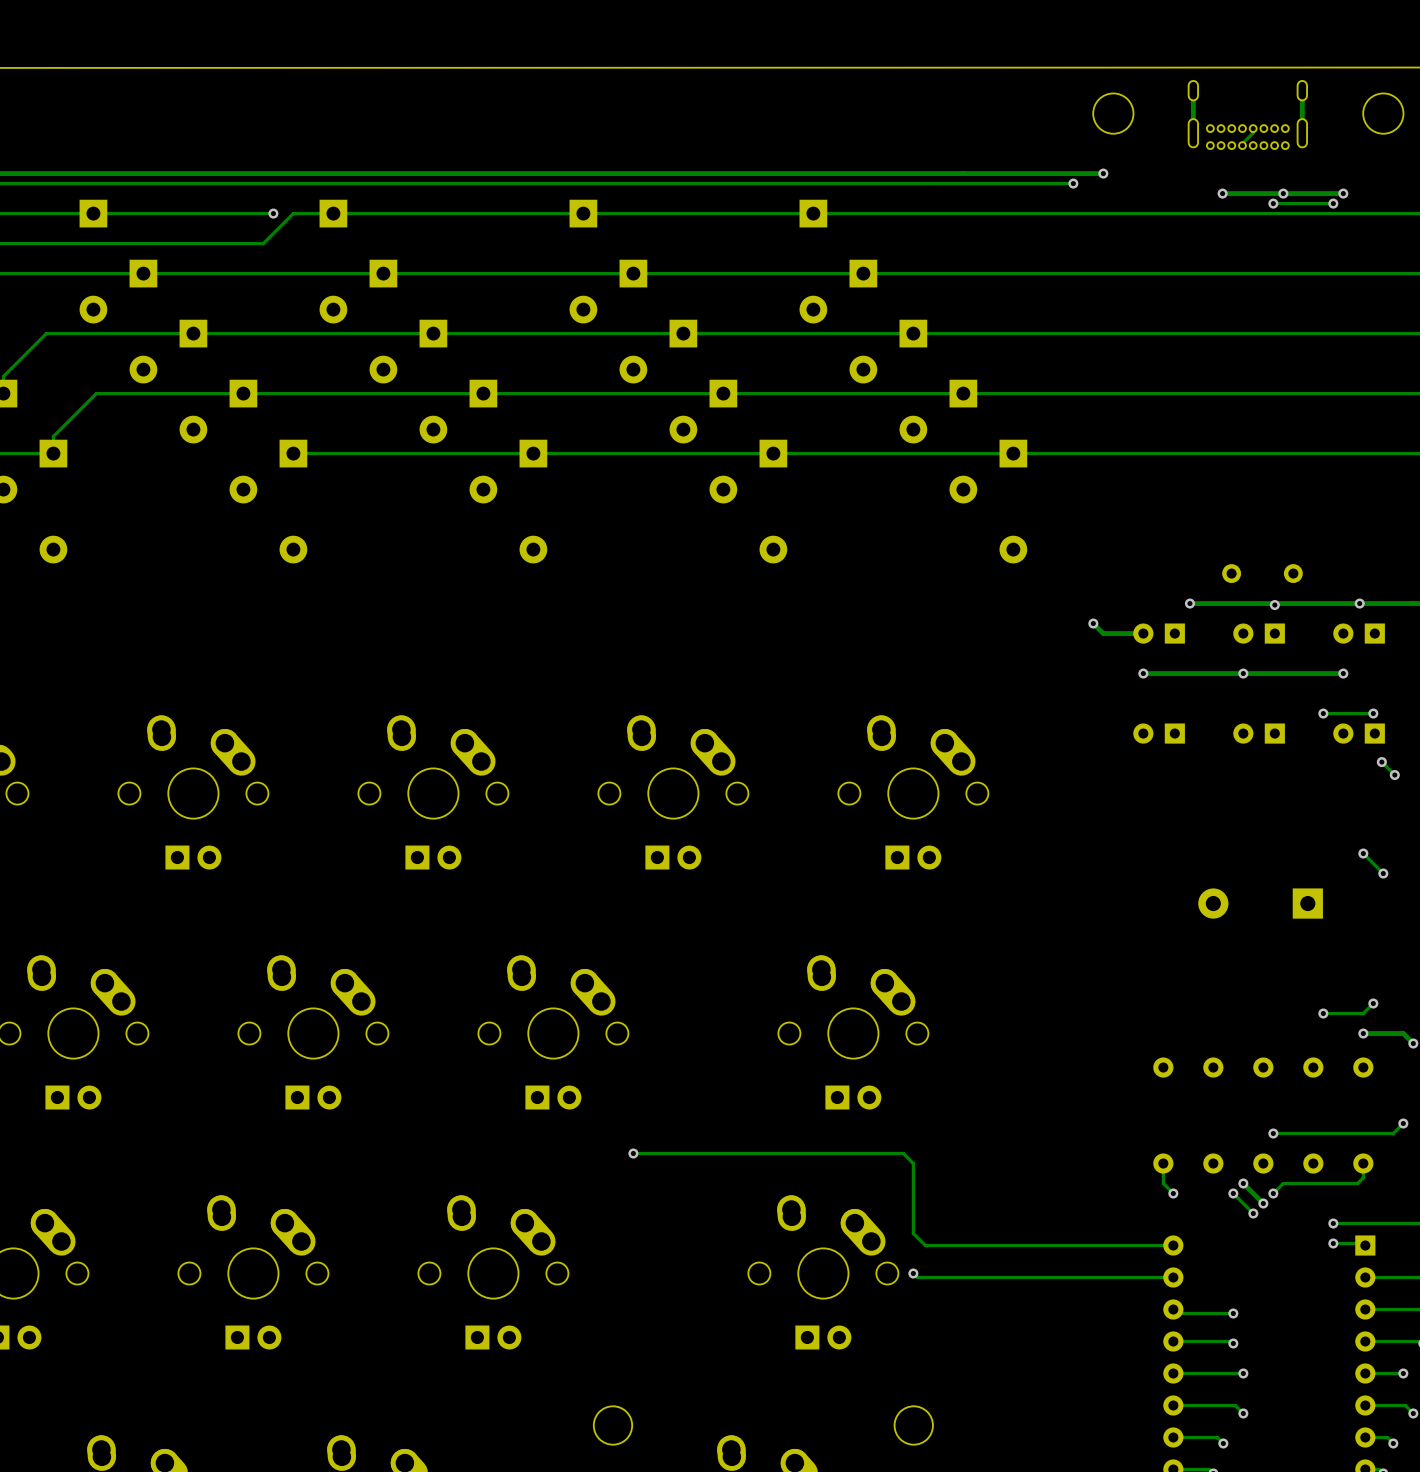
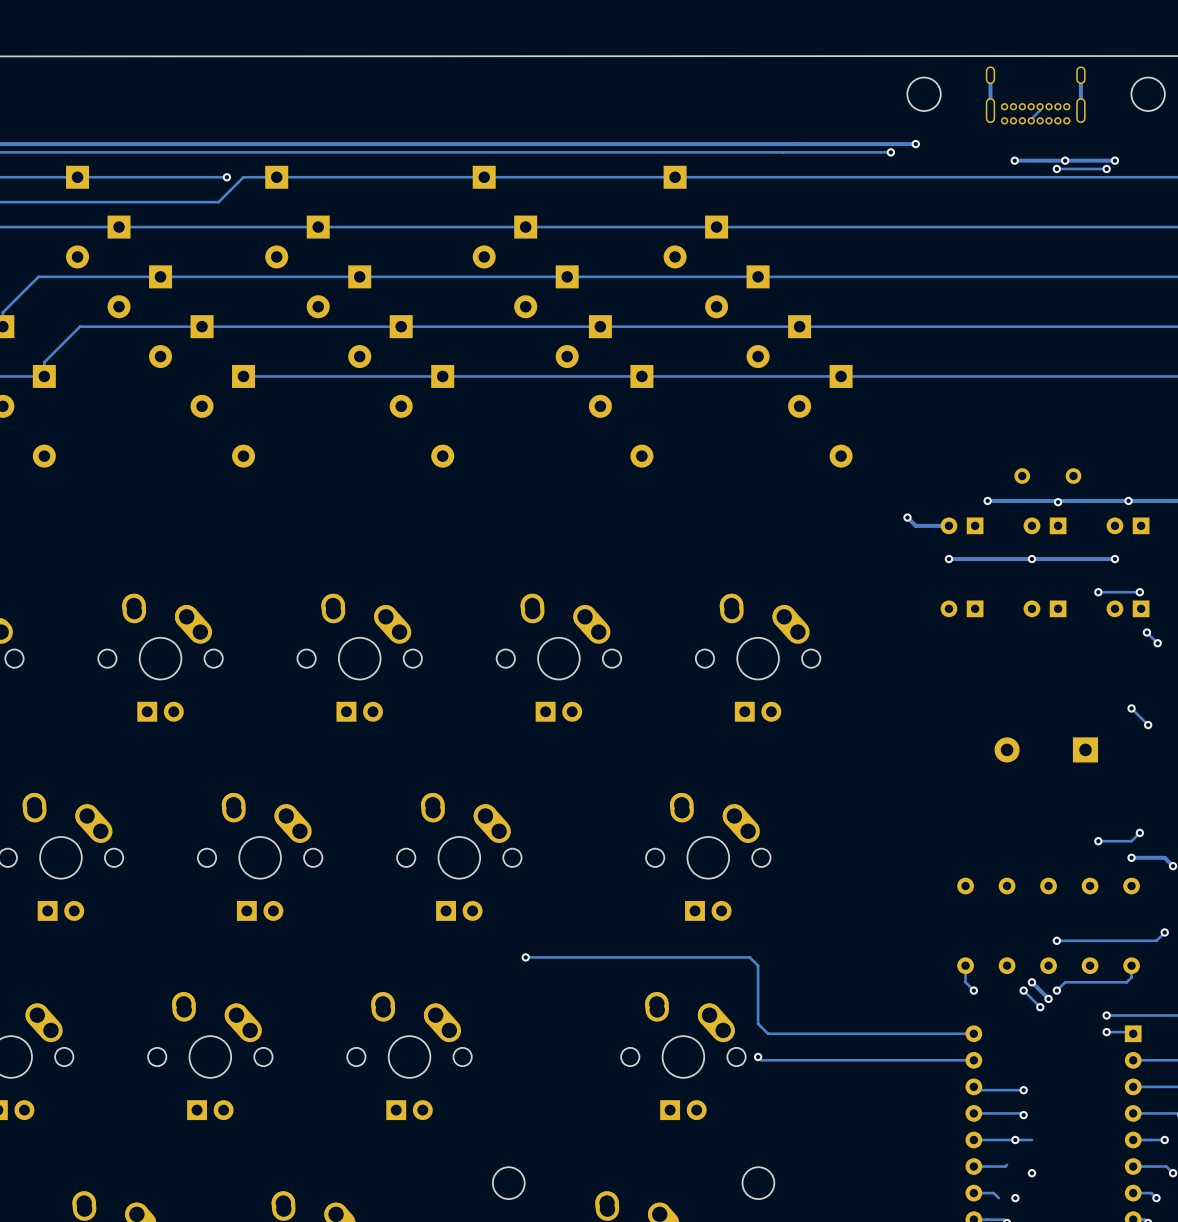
via position: (1243, 1373) -> (1015, 1139)
track: (1211, 1405) (1235, 1405) (1243, 1413) -> (1005, 1166) (1007, 1164)
track: (1197, 1437) (1217, 1437) (1223, 1443) -> (993, 1193) (998, 1198)

